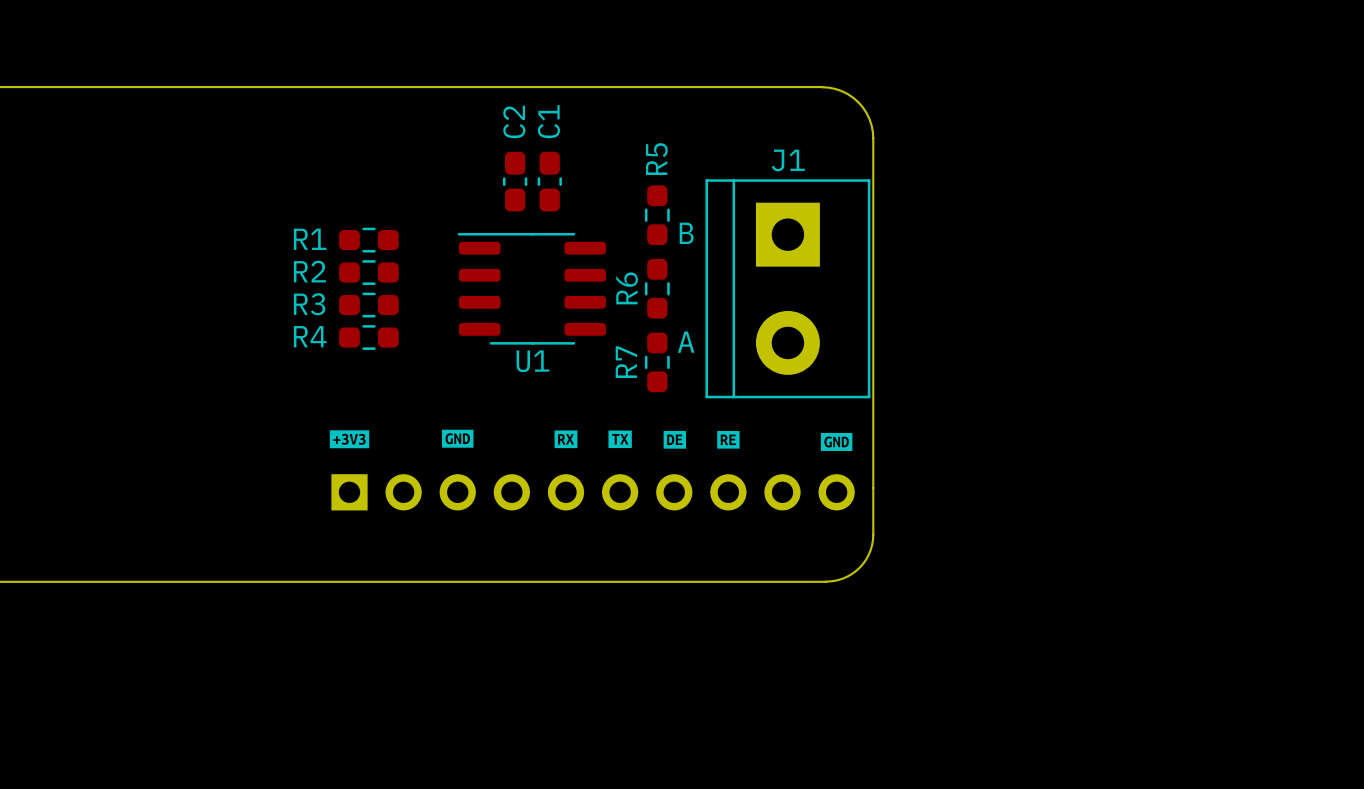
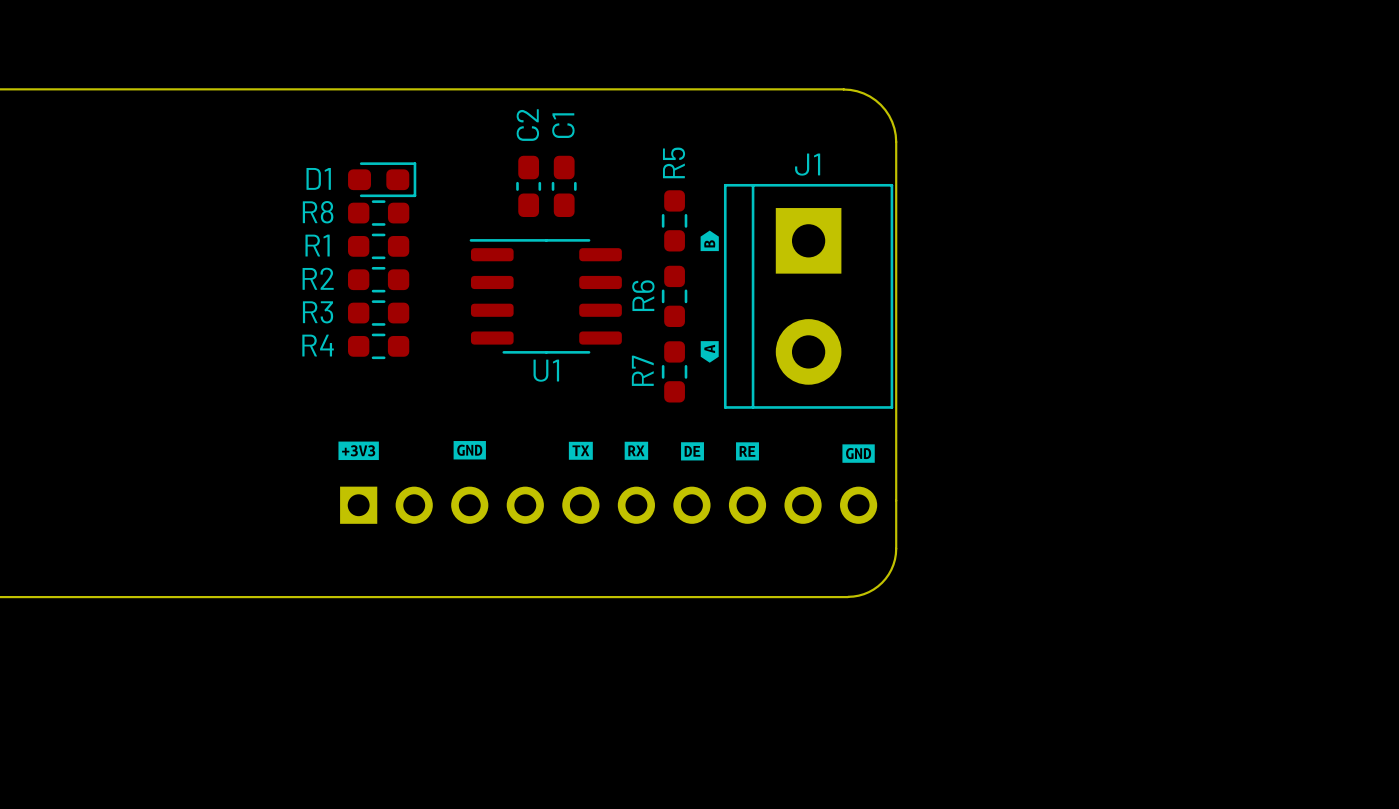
D1: none -> (382, 179)
R8: none -> (378, 213)
drawing: none -> [700, 230, 719, 252]
text: B (686, 233) -> none
drawing: none -> [700, 341, 719, 363]
text: A (686, 342) -> none
drawing position: (566, 439) -> (636, 450)
drawing position: (620, 439) -> (580, 450)

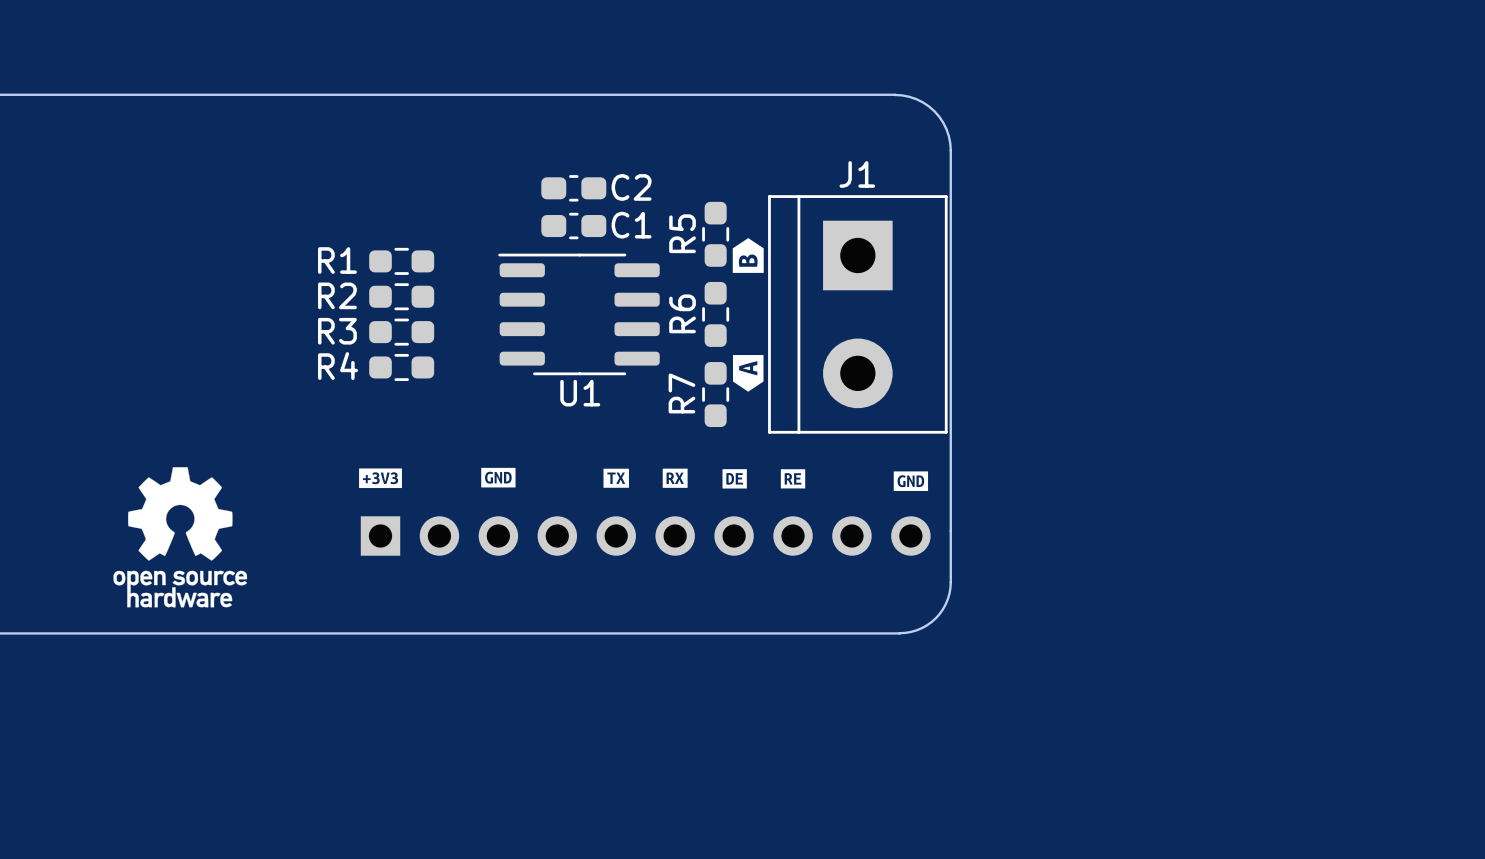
R5 name position: R5 (674, 162) -> R5 (682, 233)
D1: (382, 179) -> none
C2 rotation: 0° (528, 186) -> 90° clockwise (573, 188)
C1 rotation: 0° (564, 186) -> 90° clockwise (573, 226)
R8: (378, 213) -> none
drawing shape: [700, 230, 719, 252] -> [732, 238, 764, 273]
drawing shape: [700, 341, 719, 363] -> [732, 355, 764, 392]
drawing: none -> [113, 467, 248, 608]

